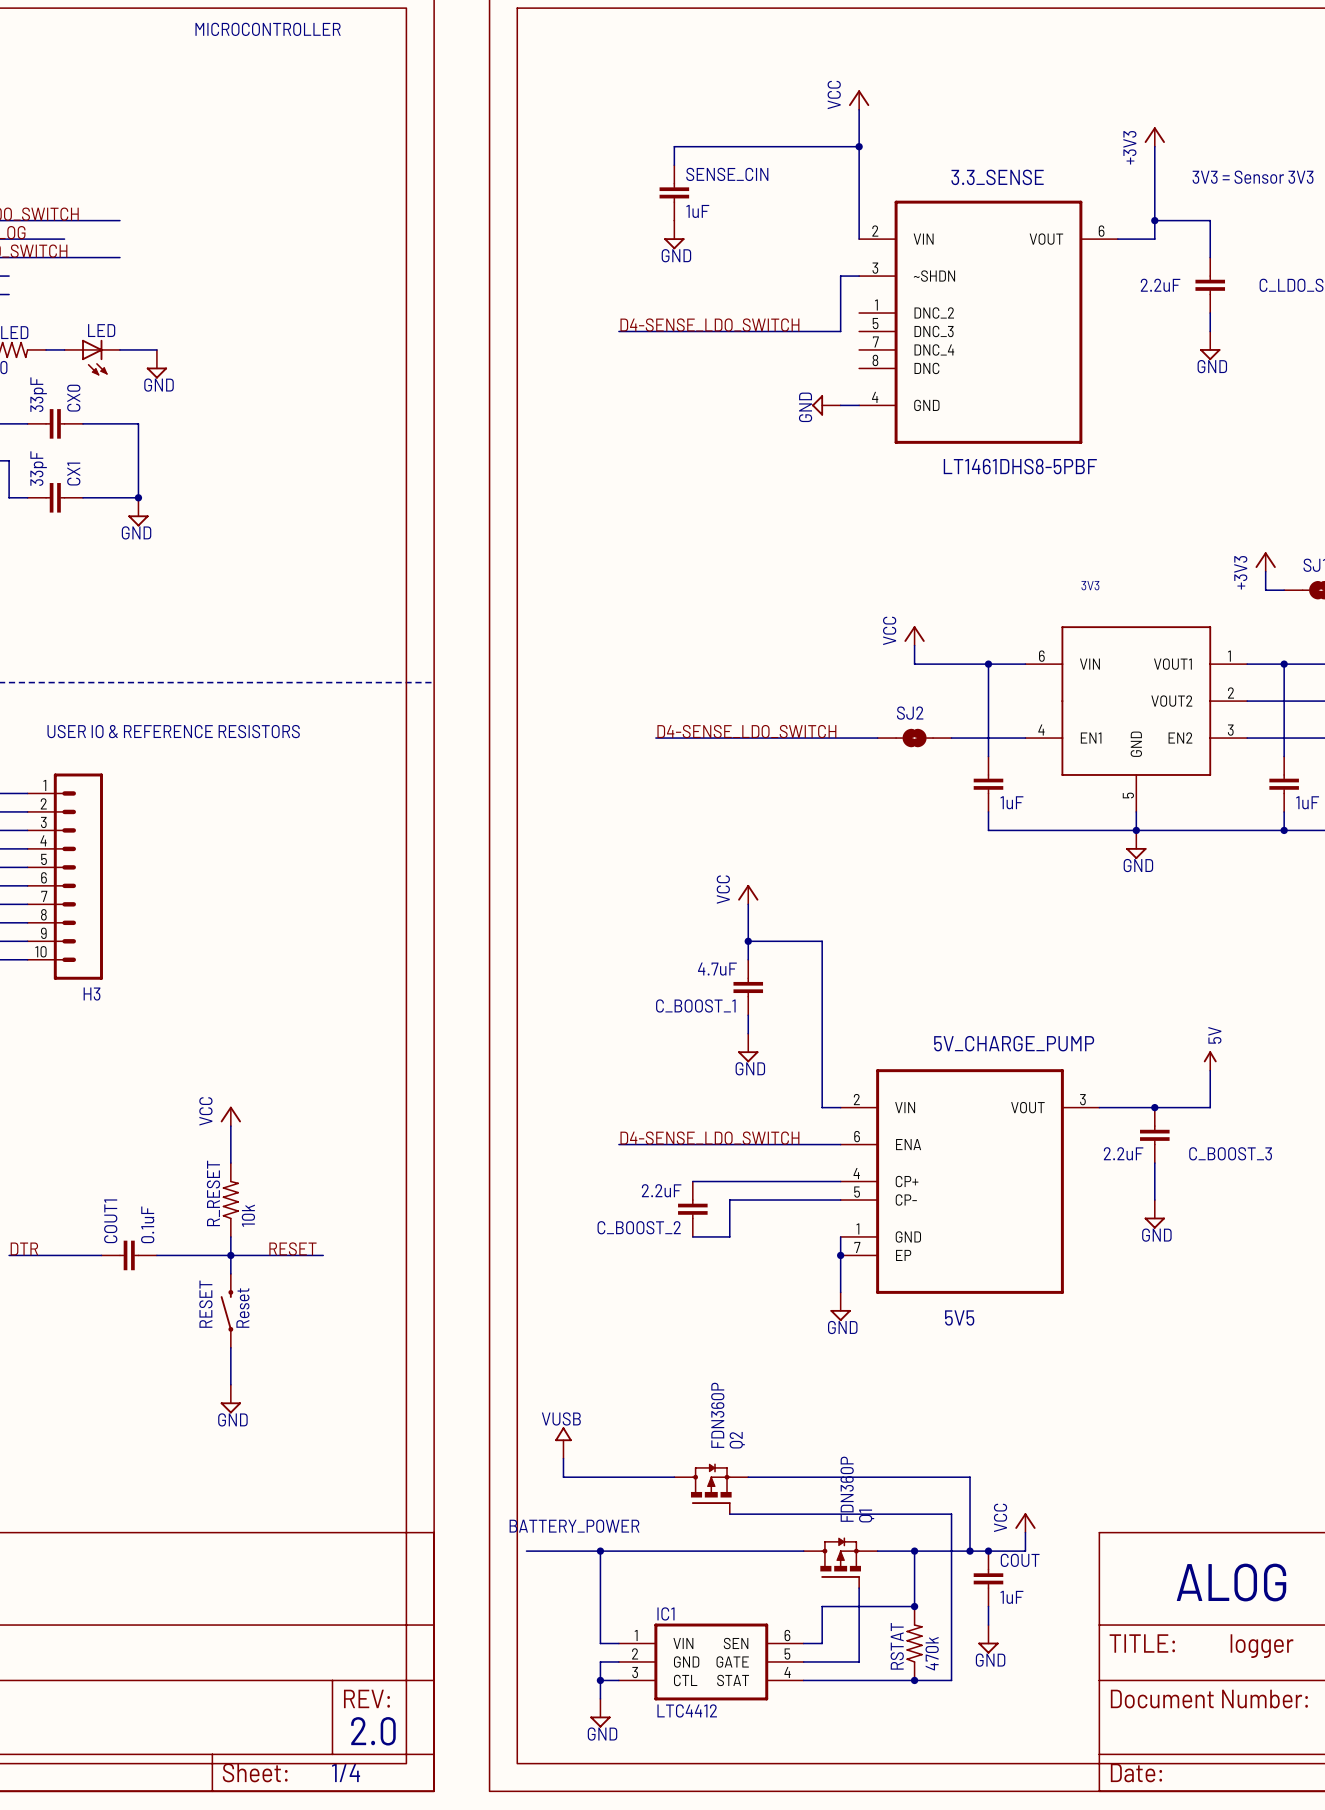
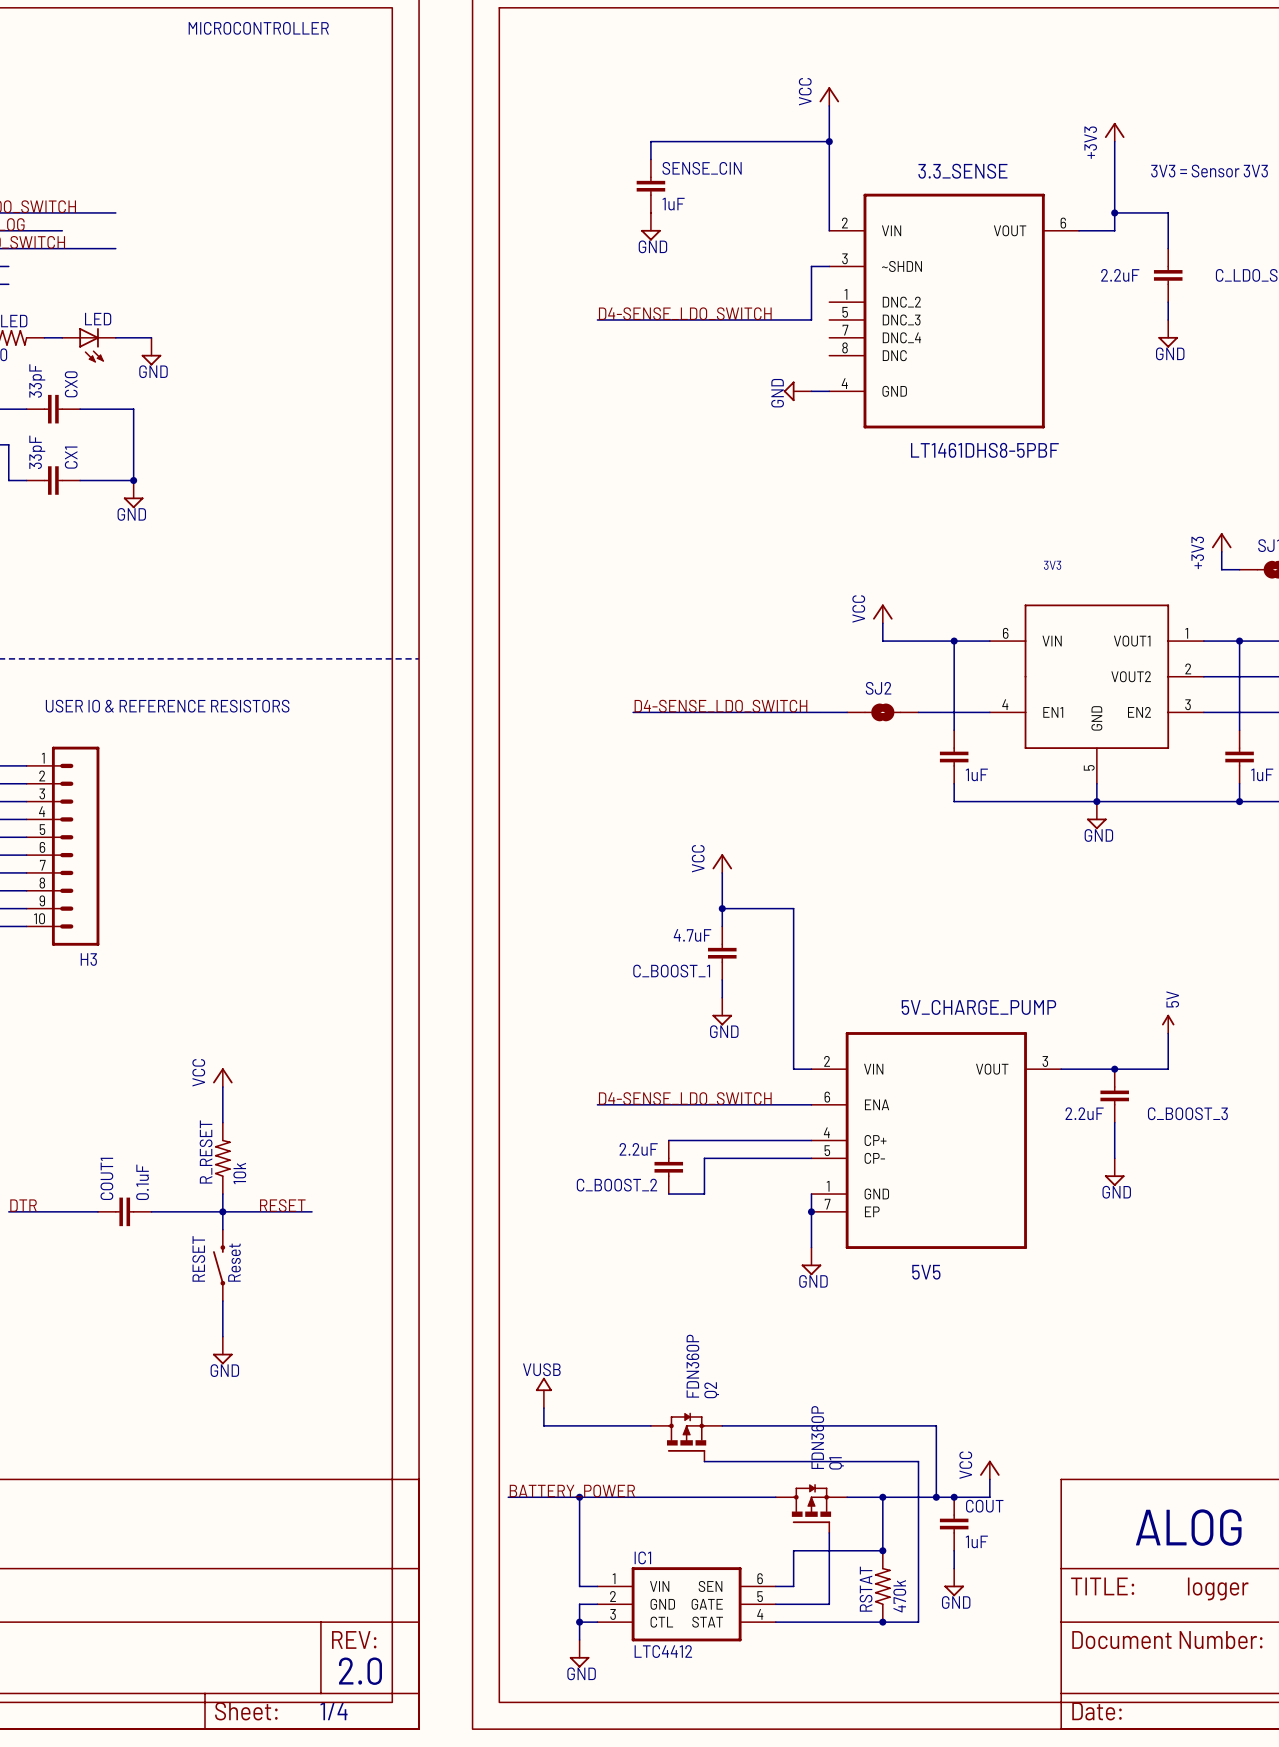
text: BATTERY_POWER (574, 1526) -> none
label: none -> BATTERY_POWER (572, 1491)

